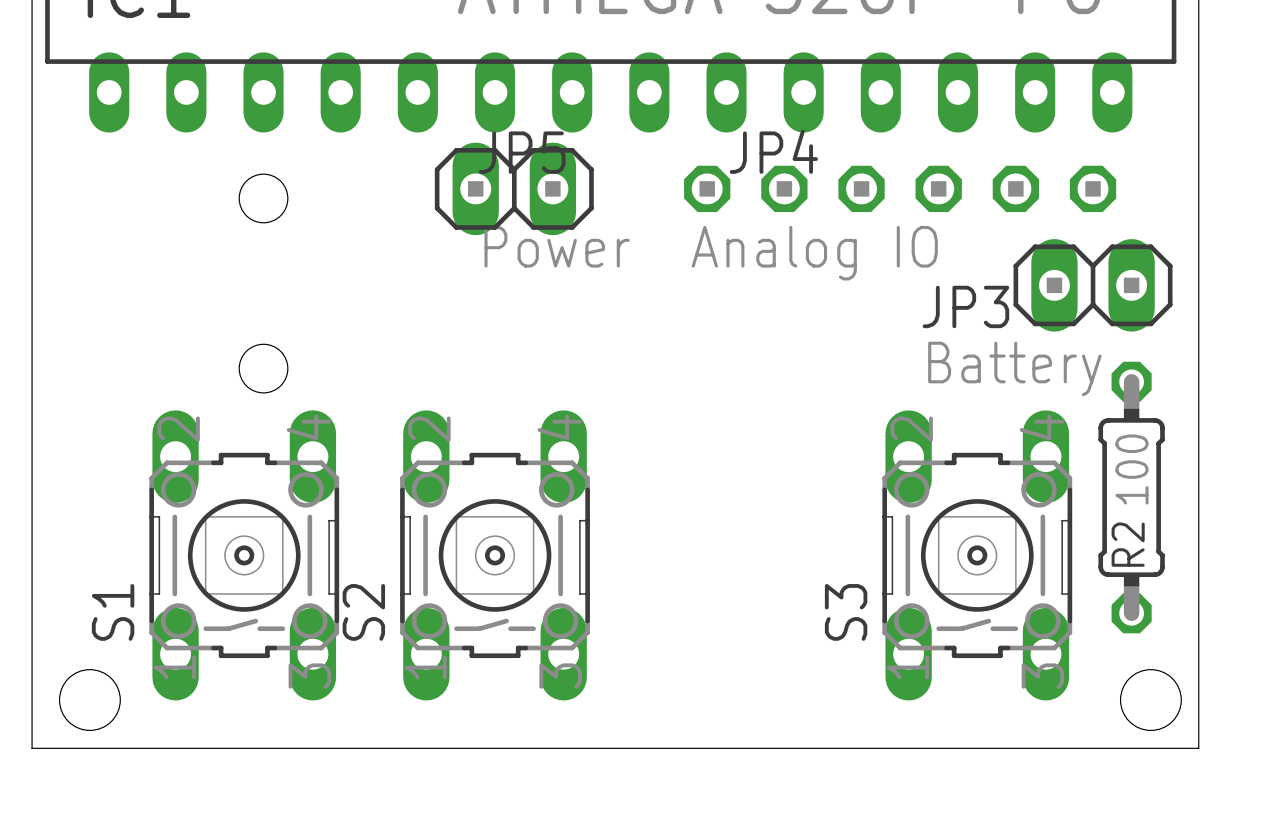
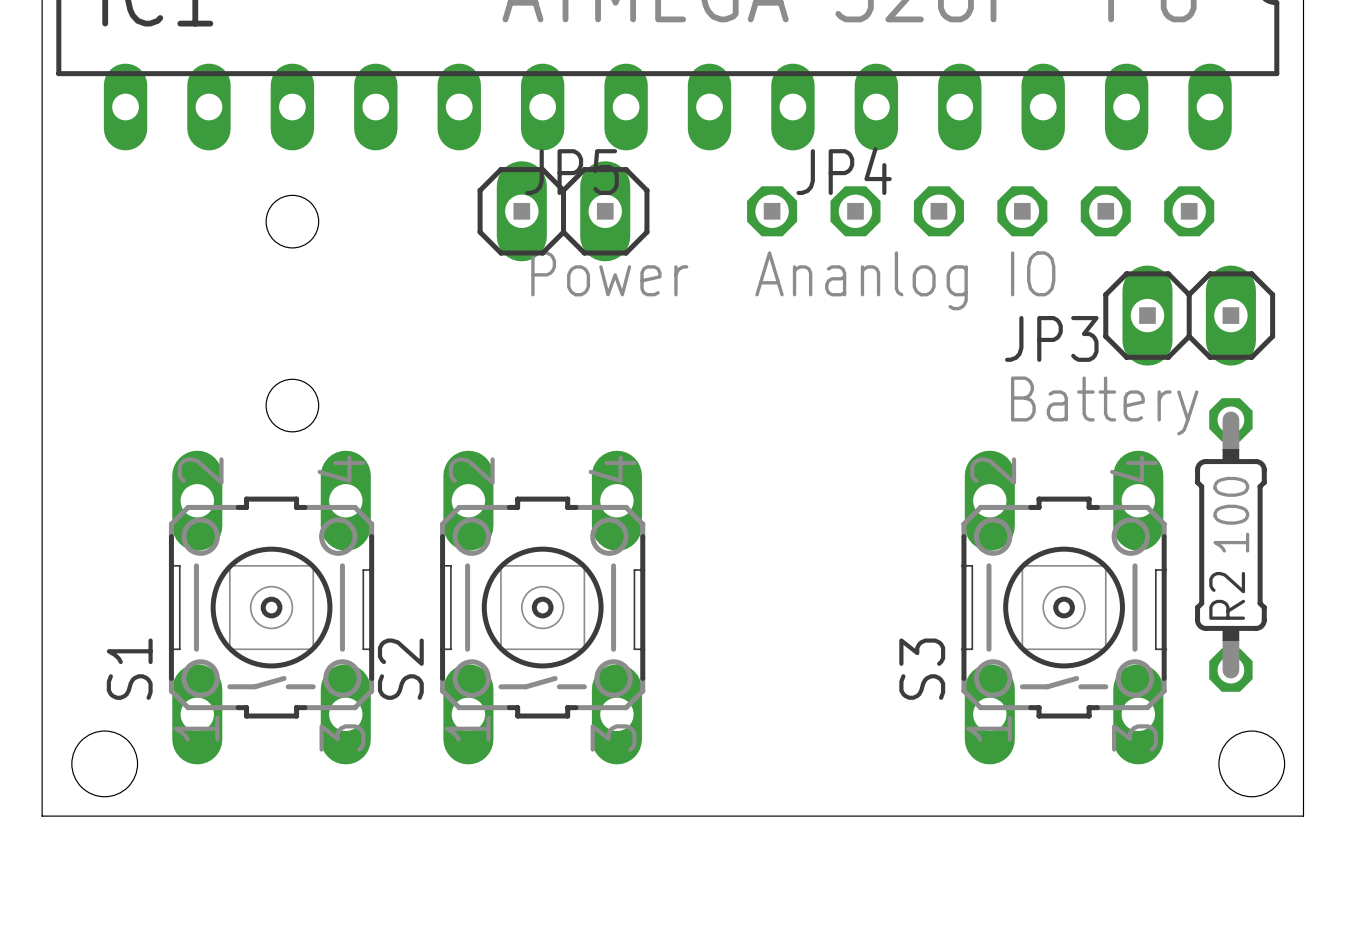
JP4 value: Analog IO (814, 253) -> Ananlog IO (905, 280)

